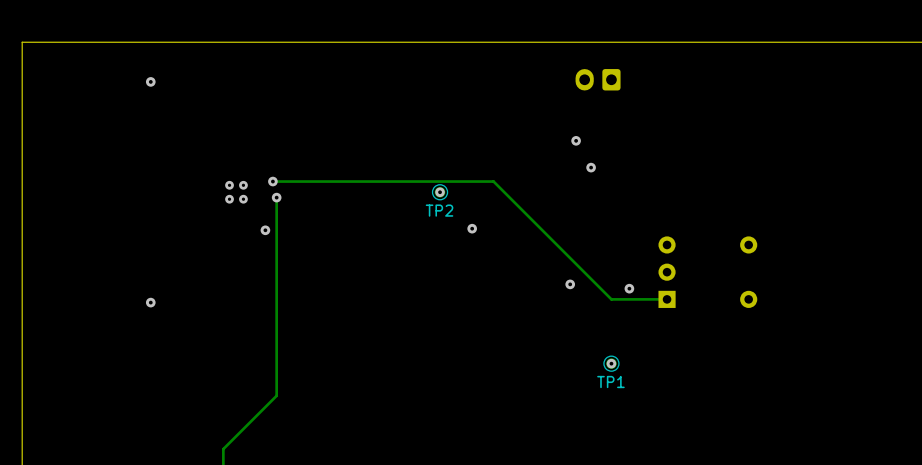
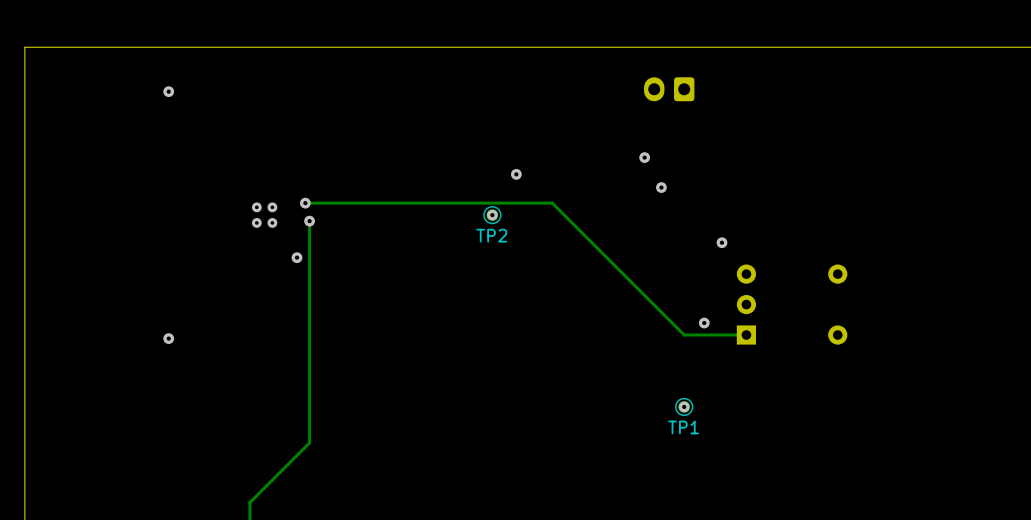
via: none -> (516, 174)
via: none -> (721, 242)
via: (472, 228) -> none
via: (570, 284) -> none

